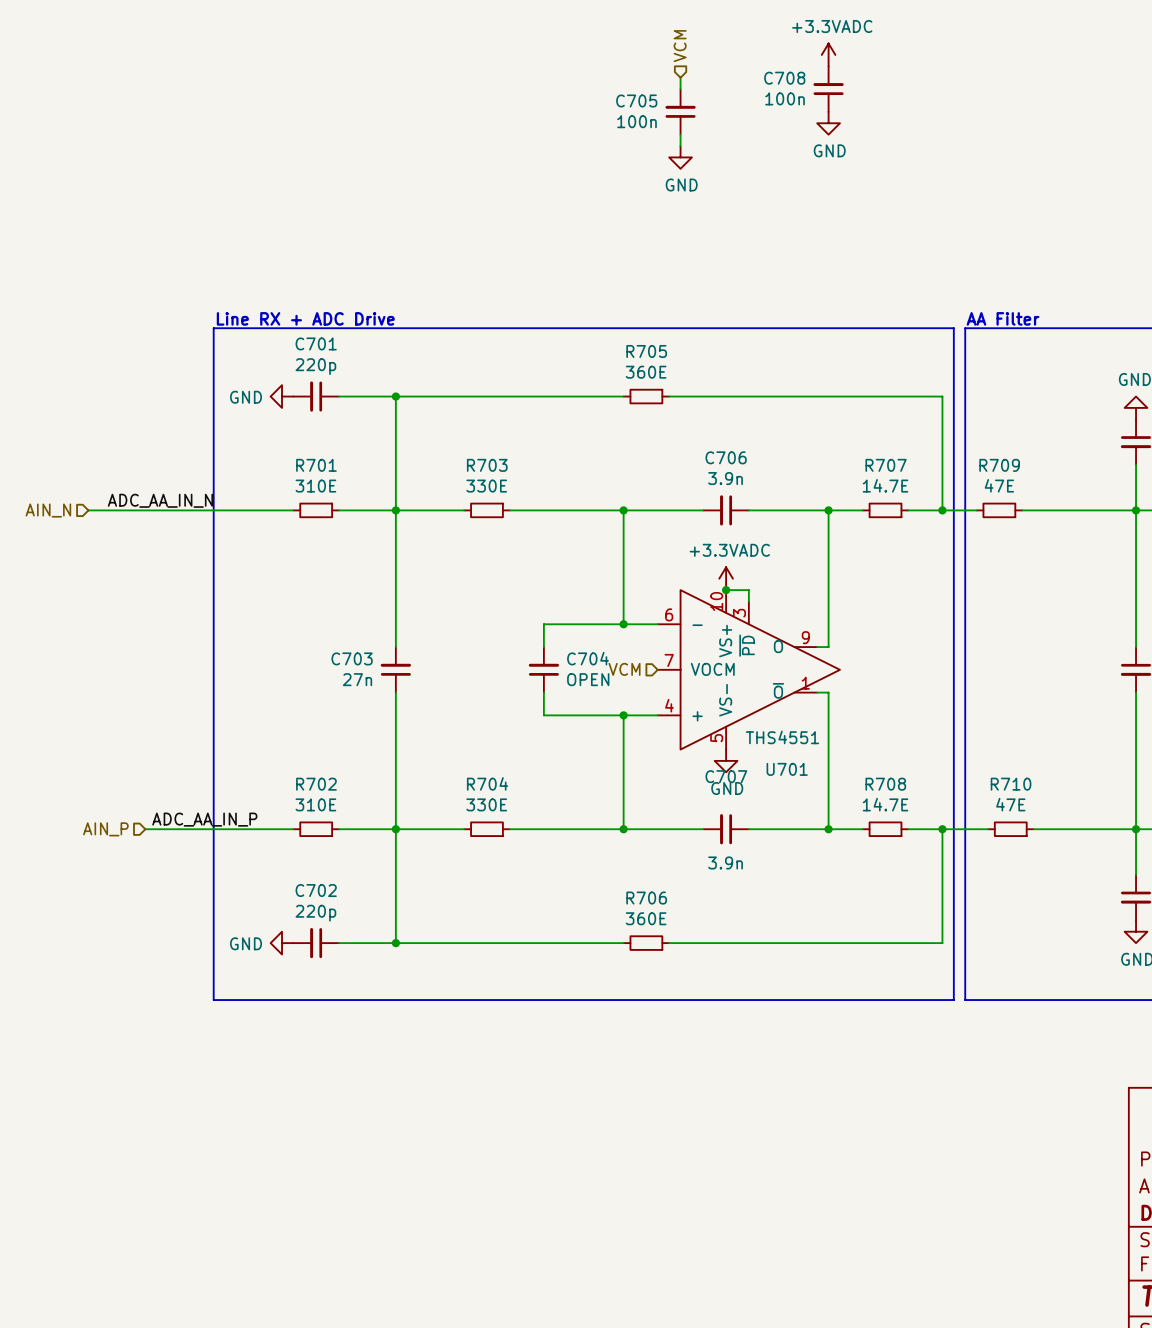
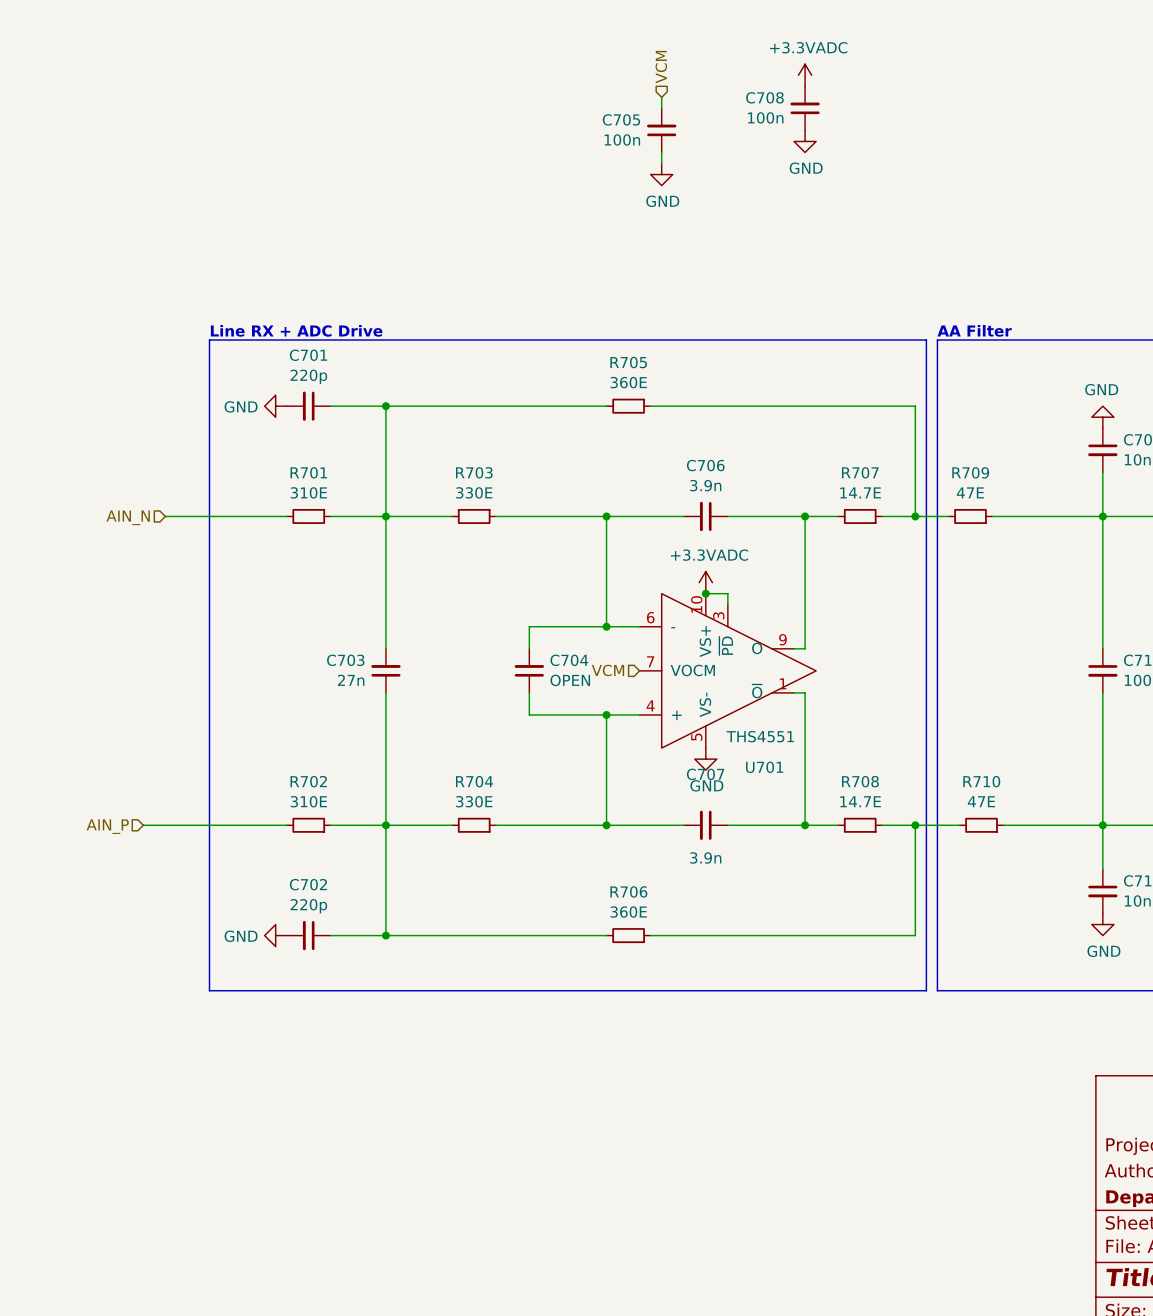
label: ADC_AA_IN_N (160, 500) -> none
hierarchical label position: AIN_N (48, 510) -> AIN_N (128, 517)
wire: (88, 510) (168, 510) -> none
label: ADC_AA_IN_P (204, 819) -> none

